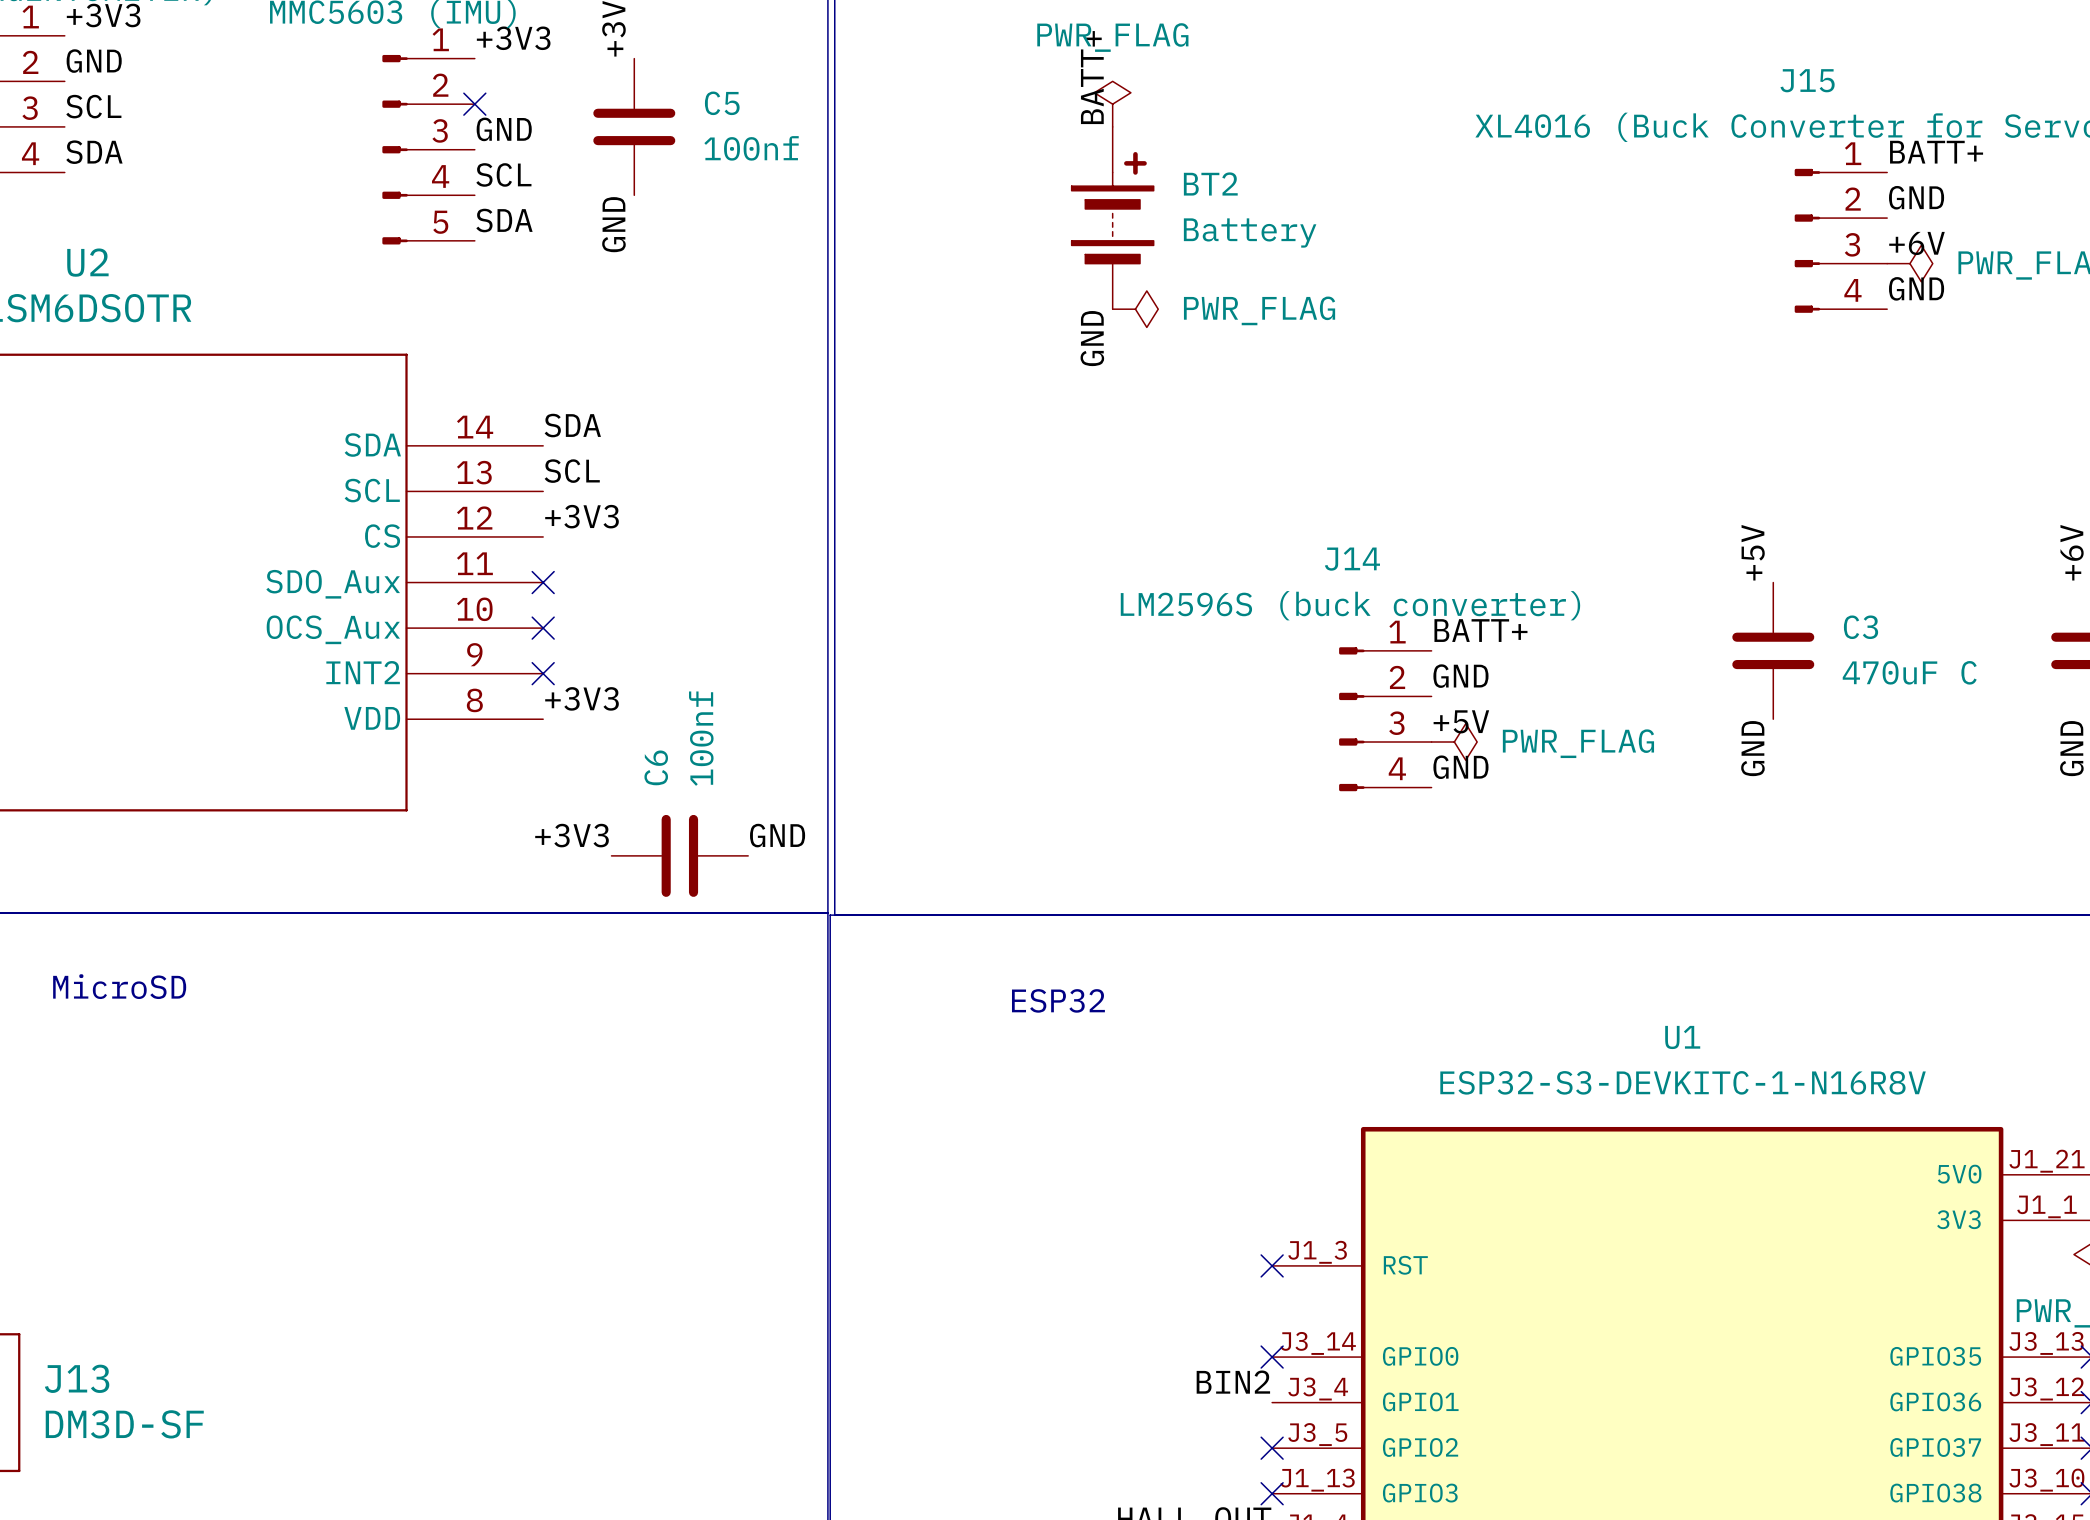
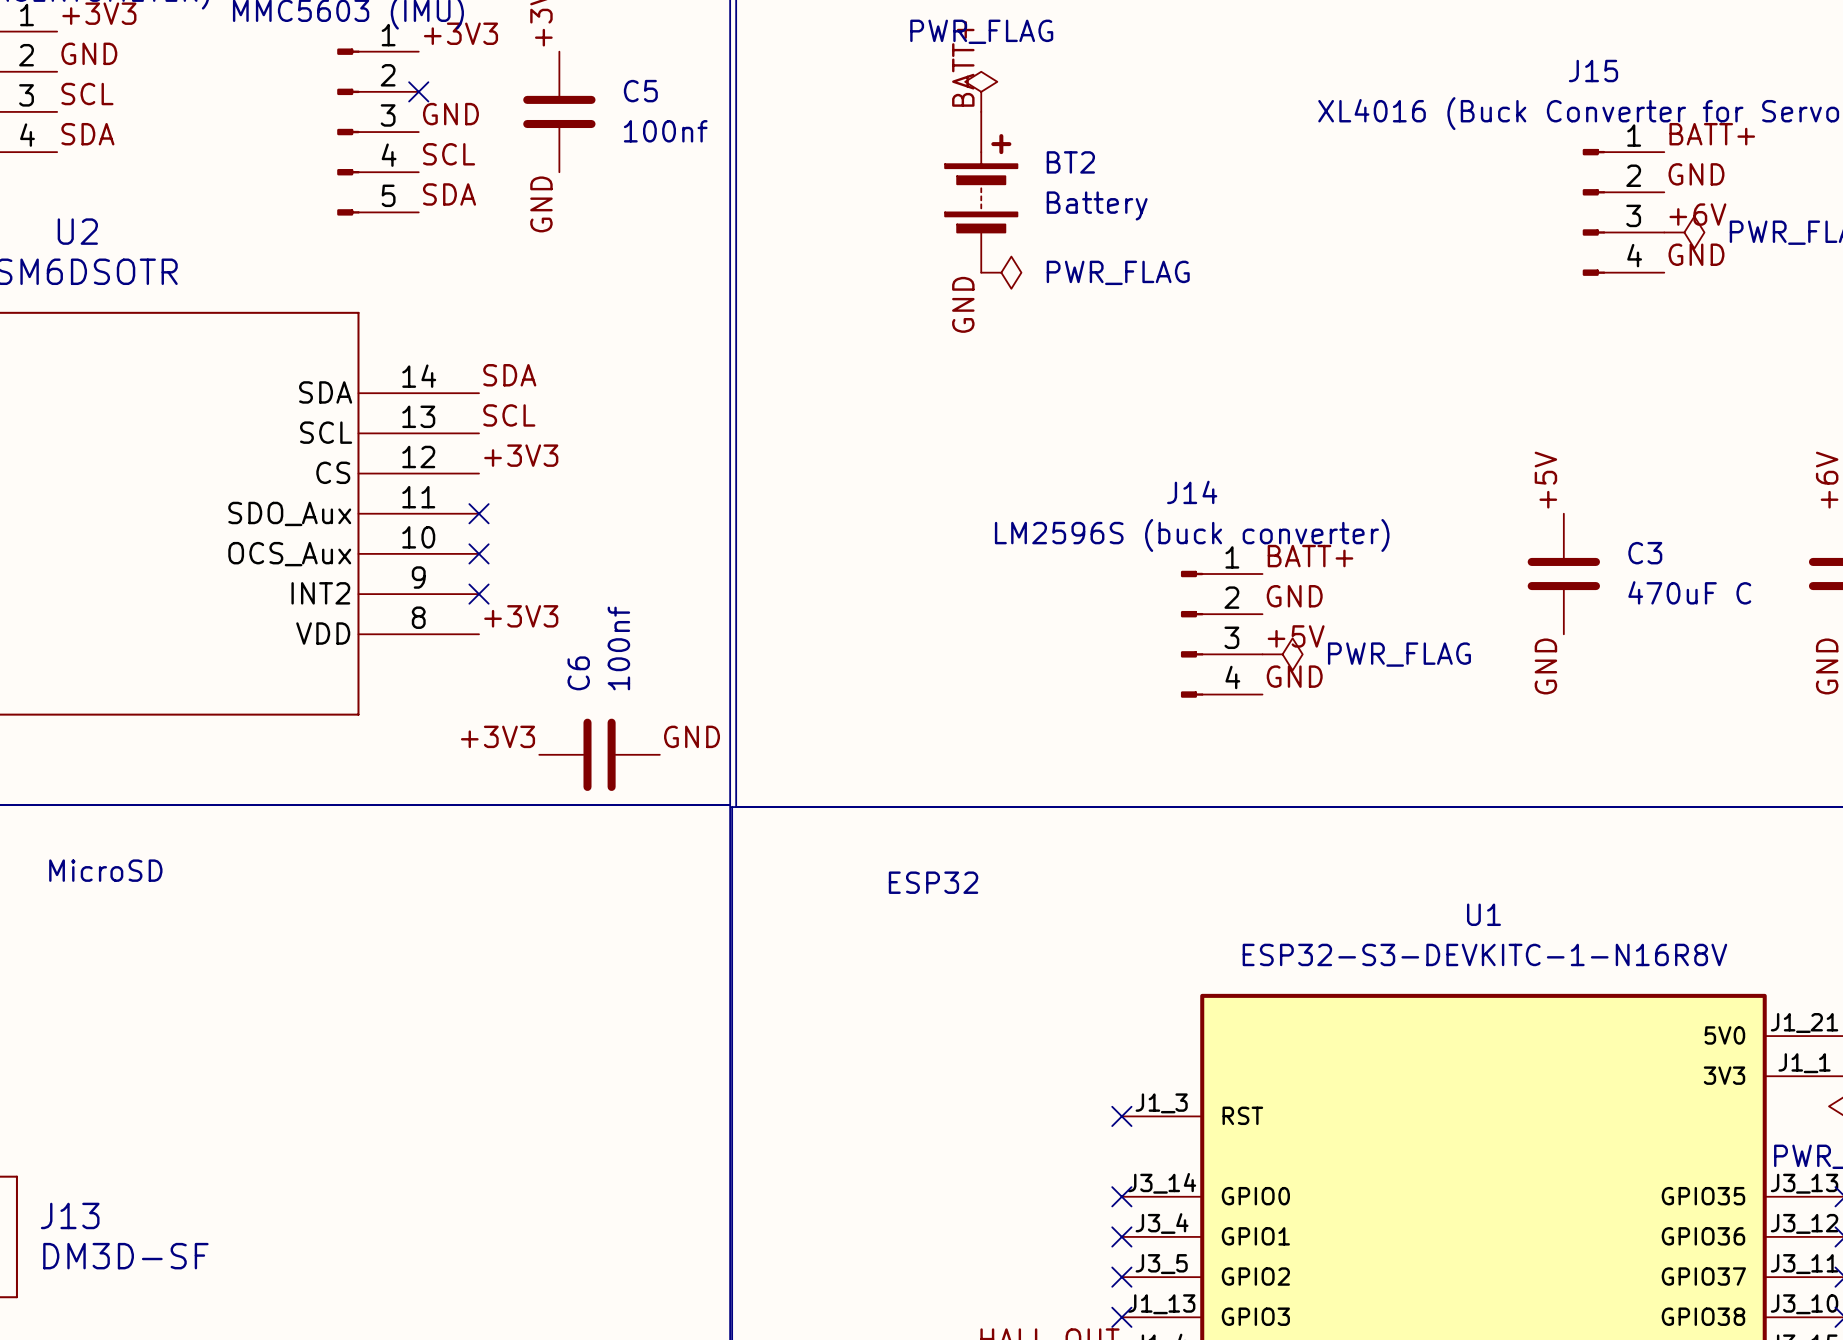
label: BIN2 (1233, 1382) -> none
no-connect mark: none -> (1121, 1236)

